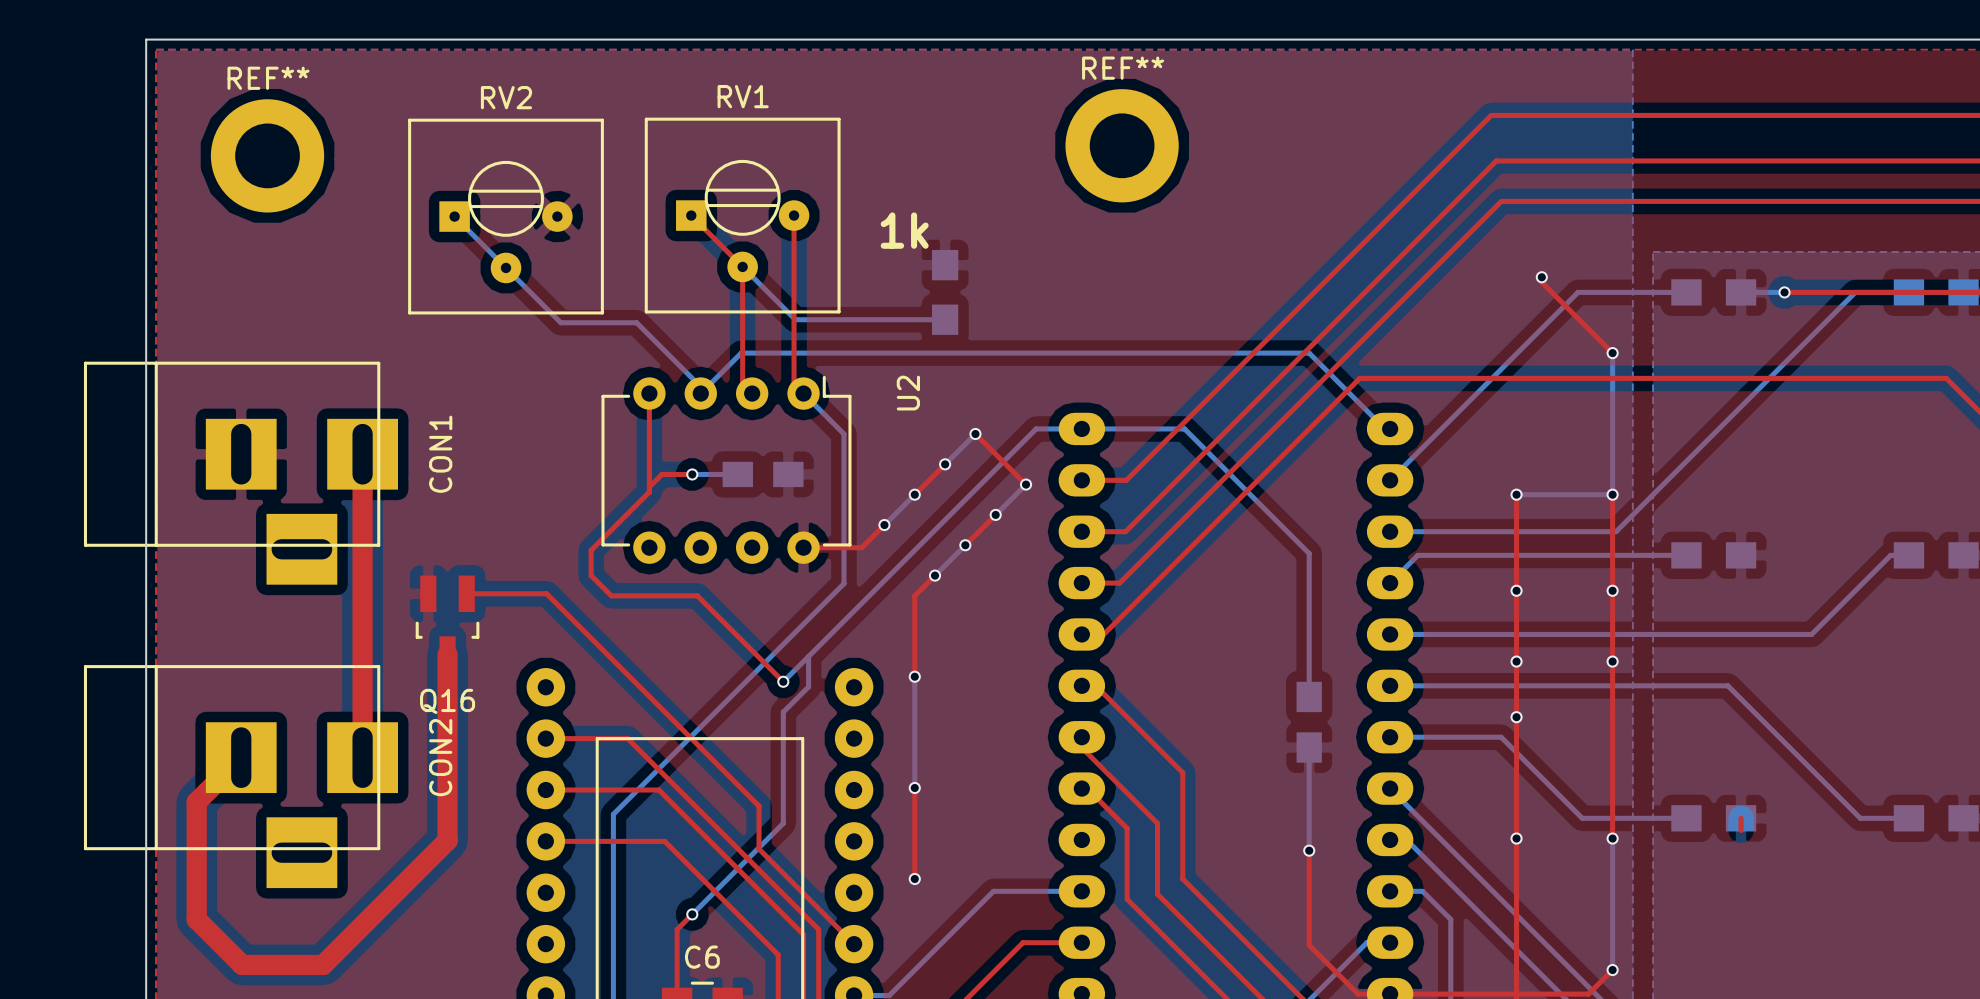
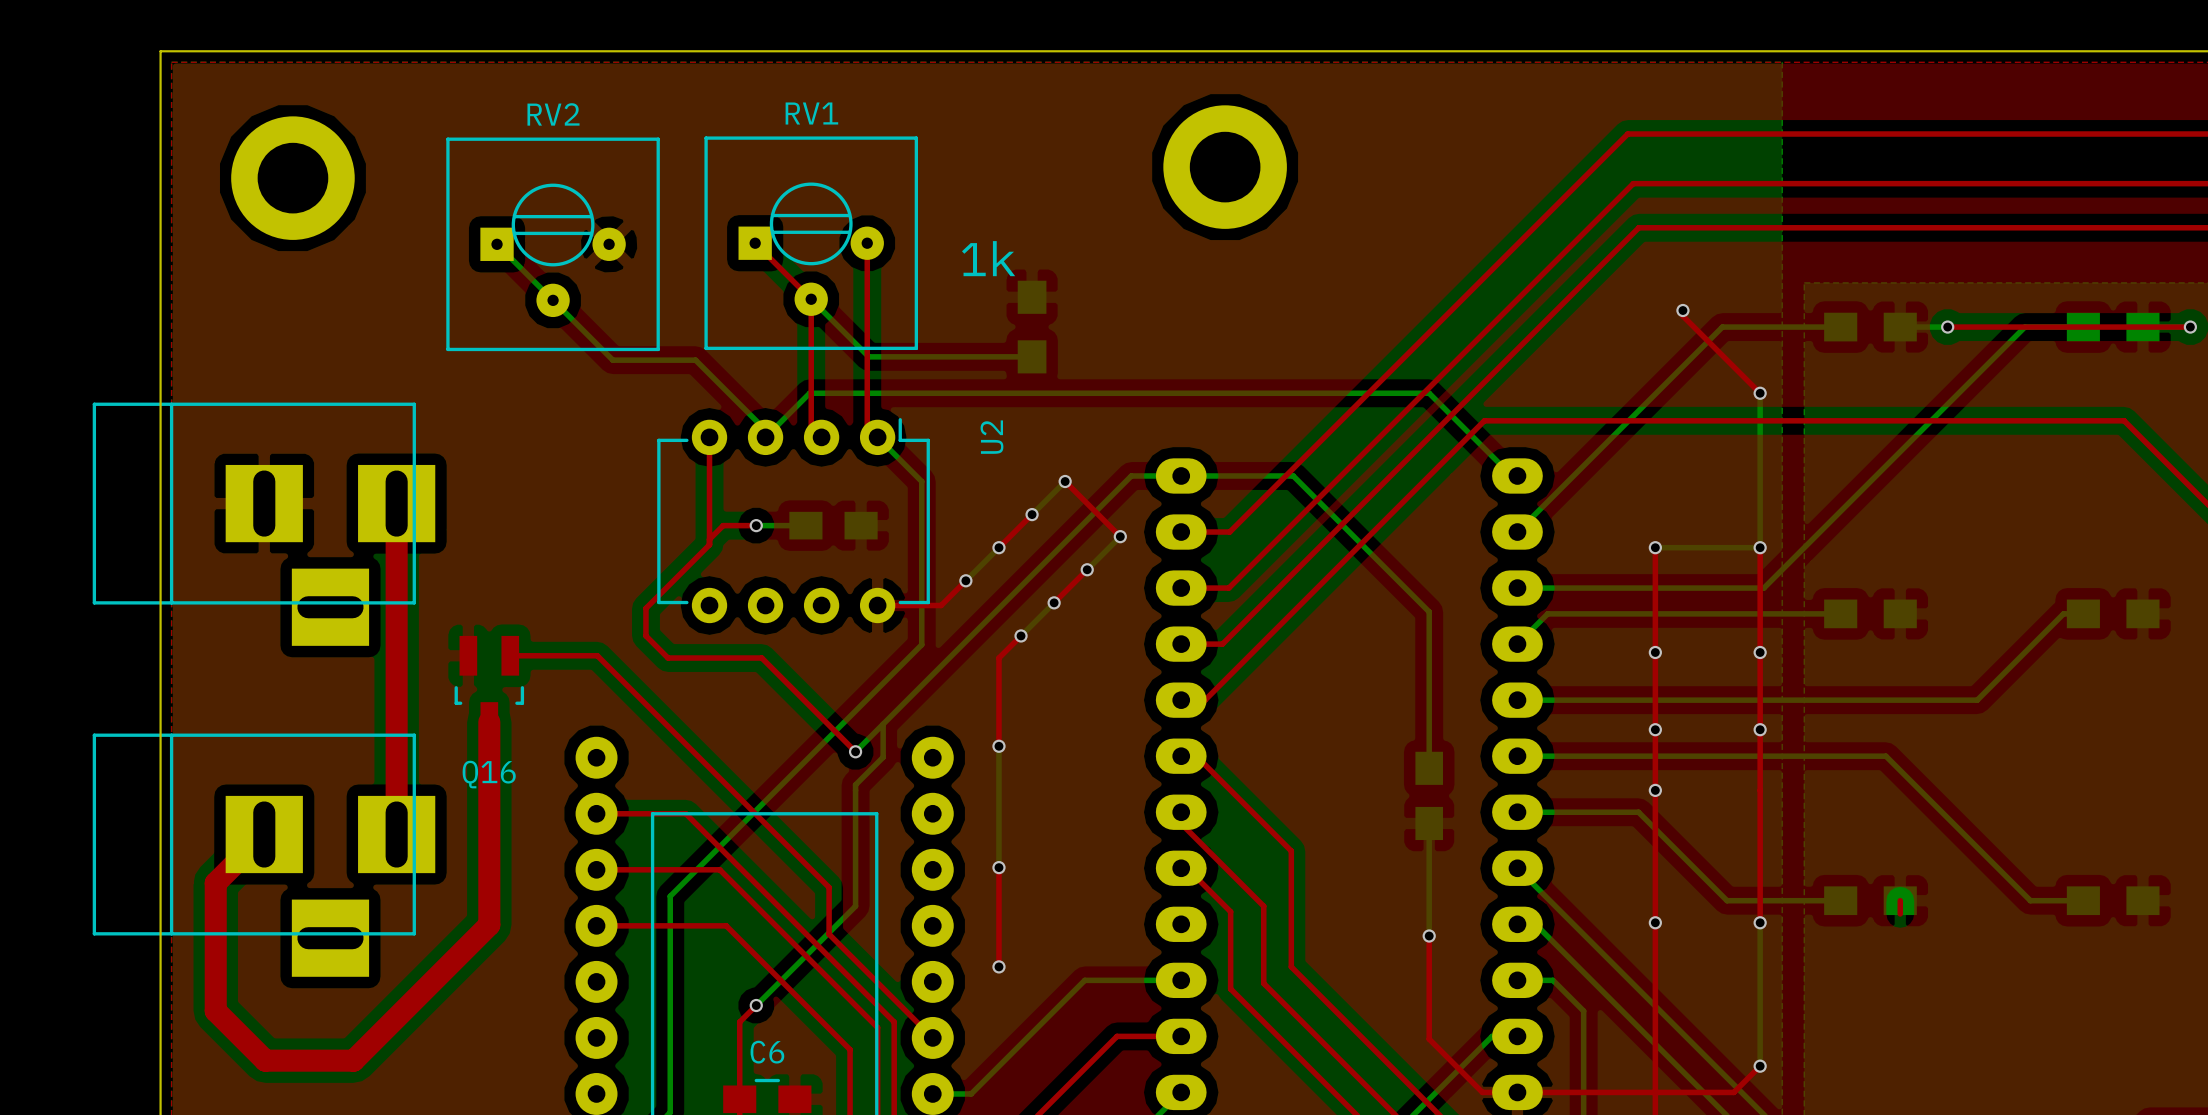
REF** name: REF** (1123, 68) -> none
REF** name: REF** (268, 78) -> none
CON1 name: CON1 (440, 454) -> none
CON2 name: CON2 (440, 757) -> none

